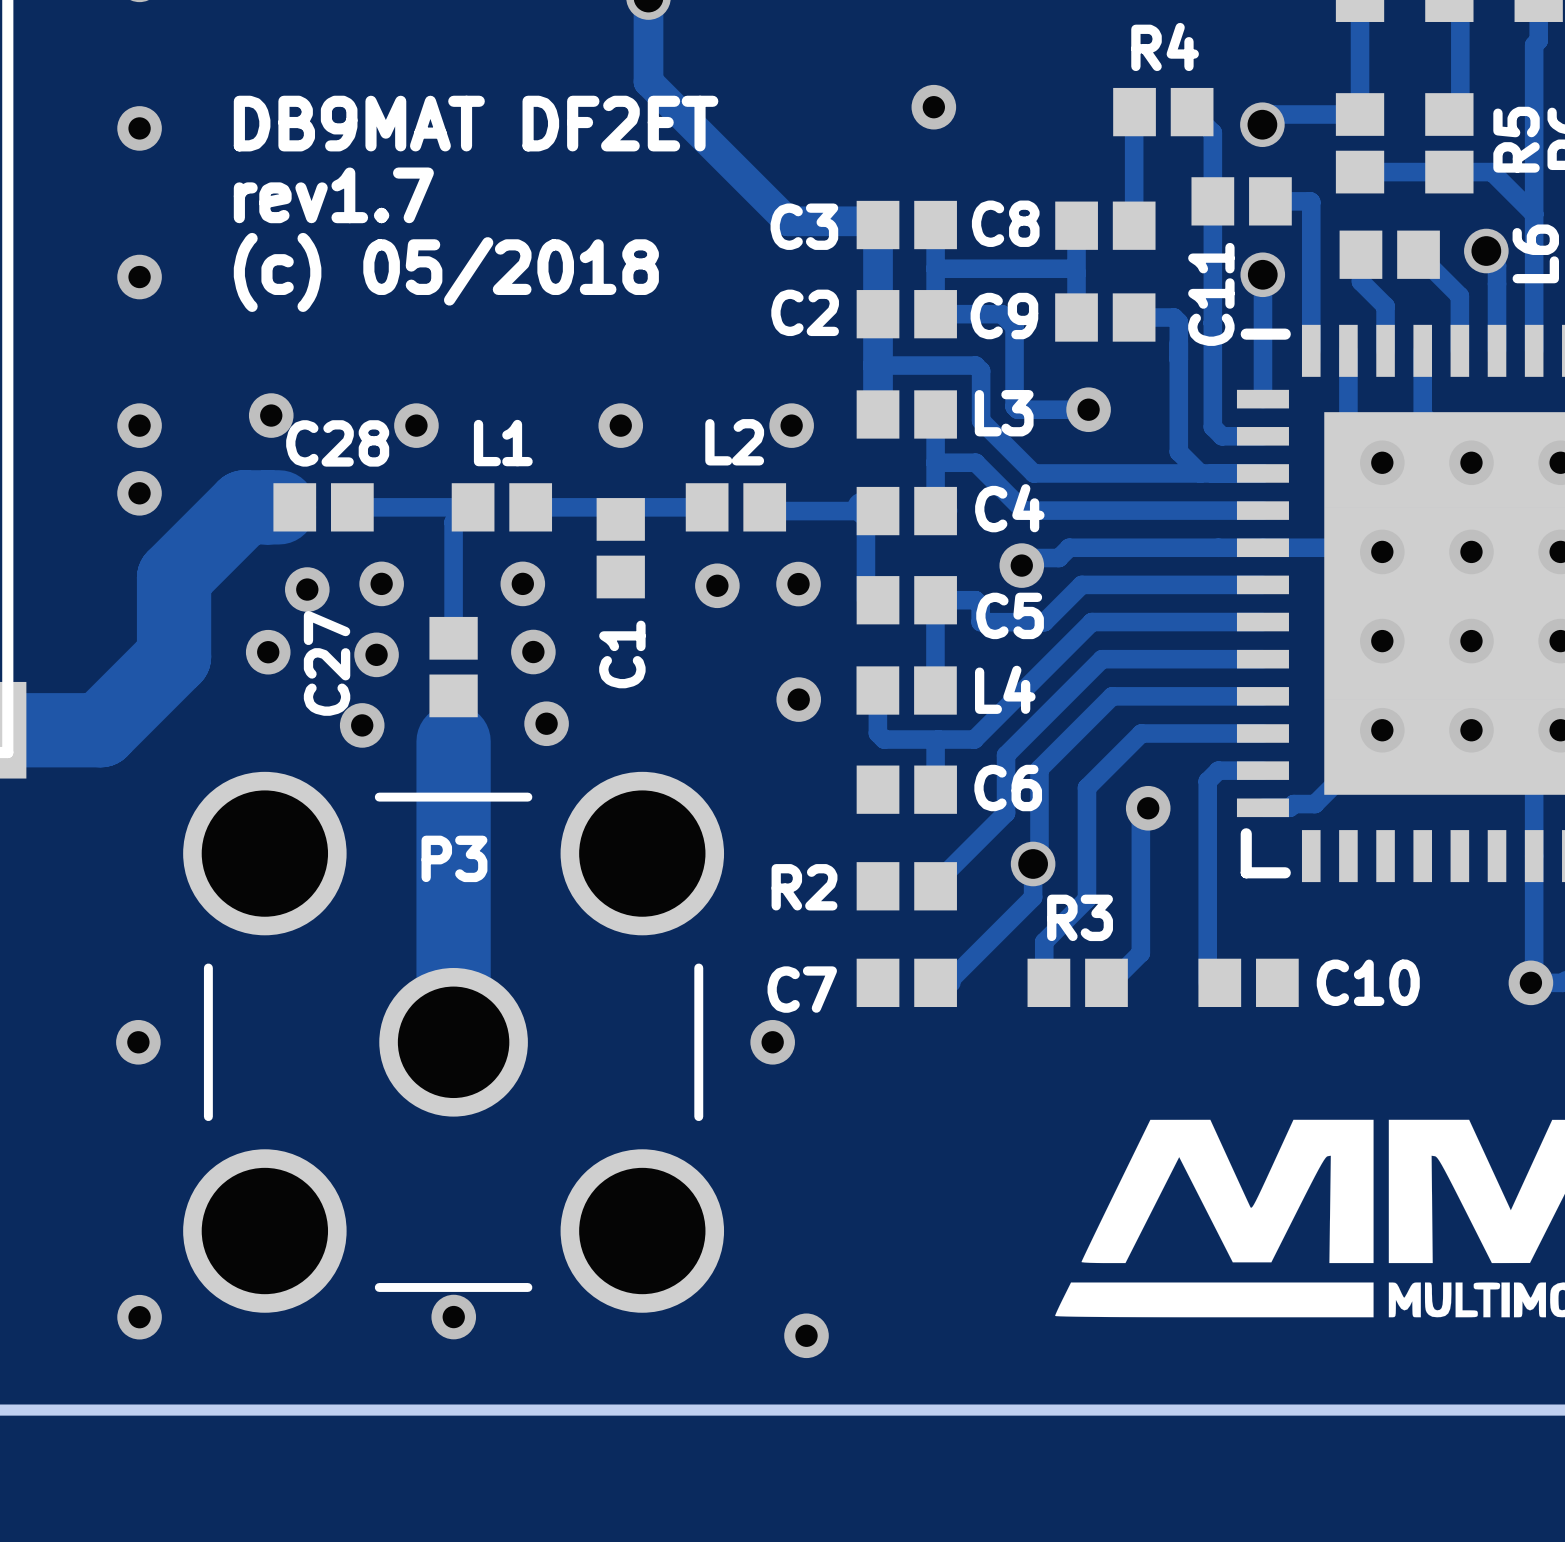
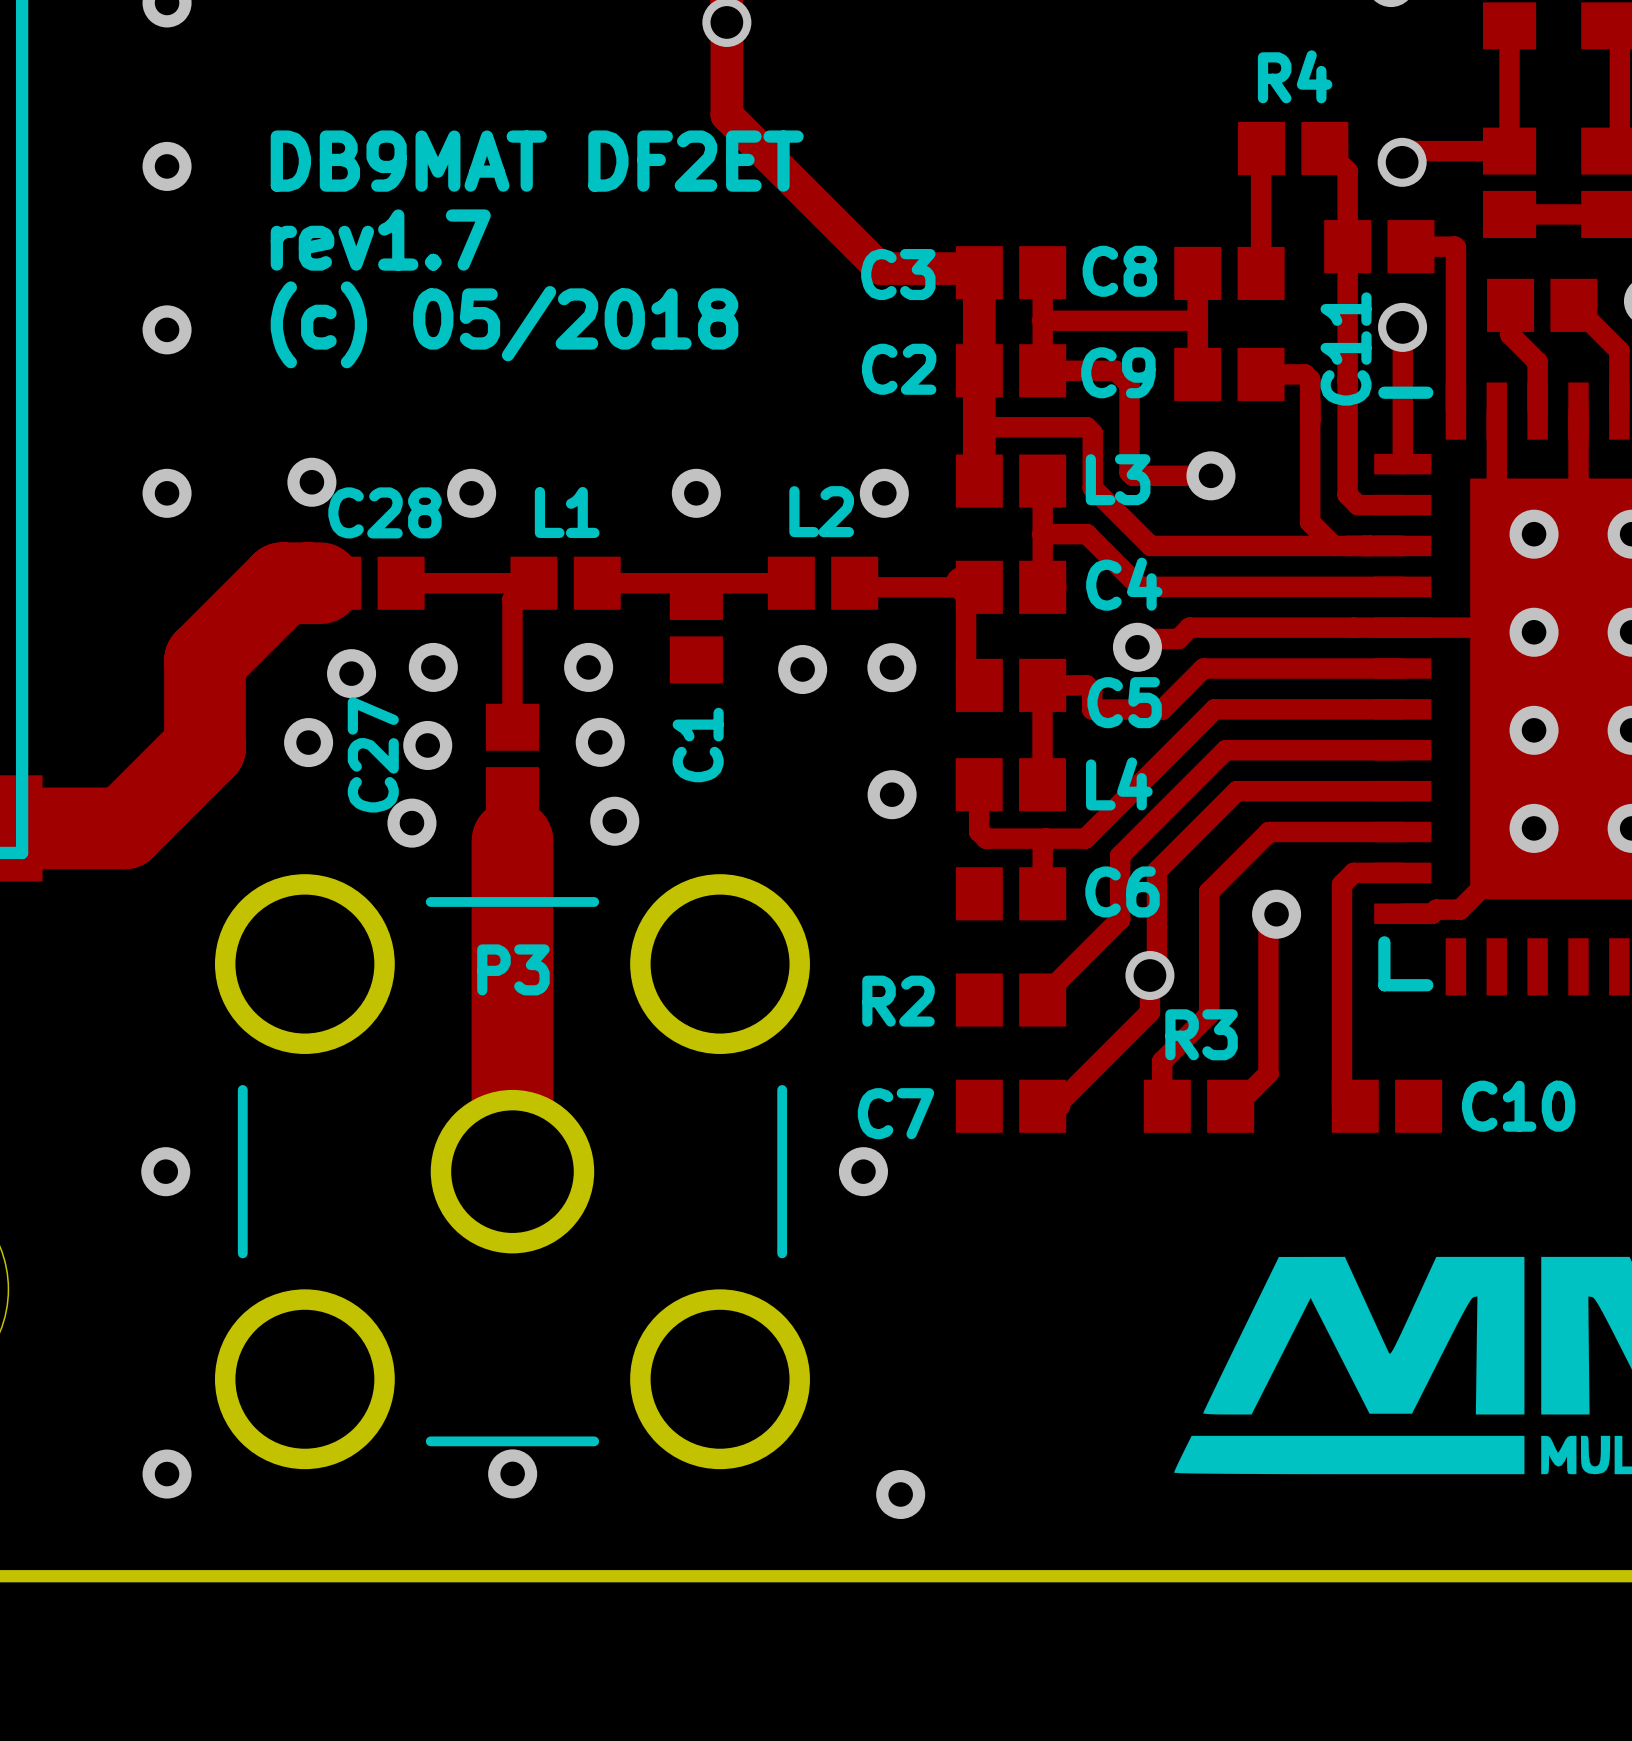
via: (933, 107) -> none
via: (139, 493) -> none

